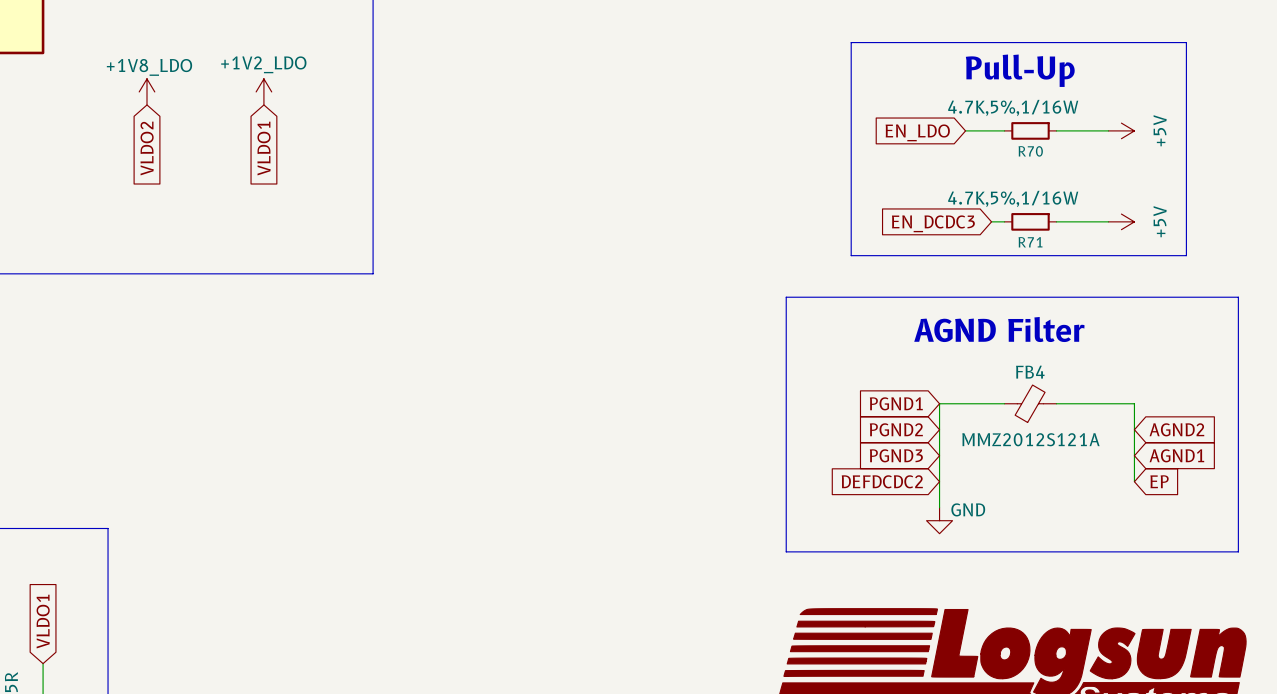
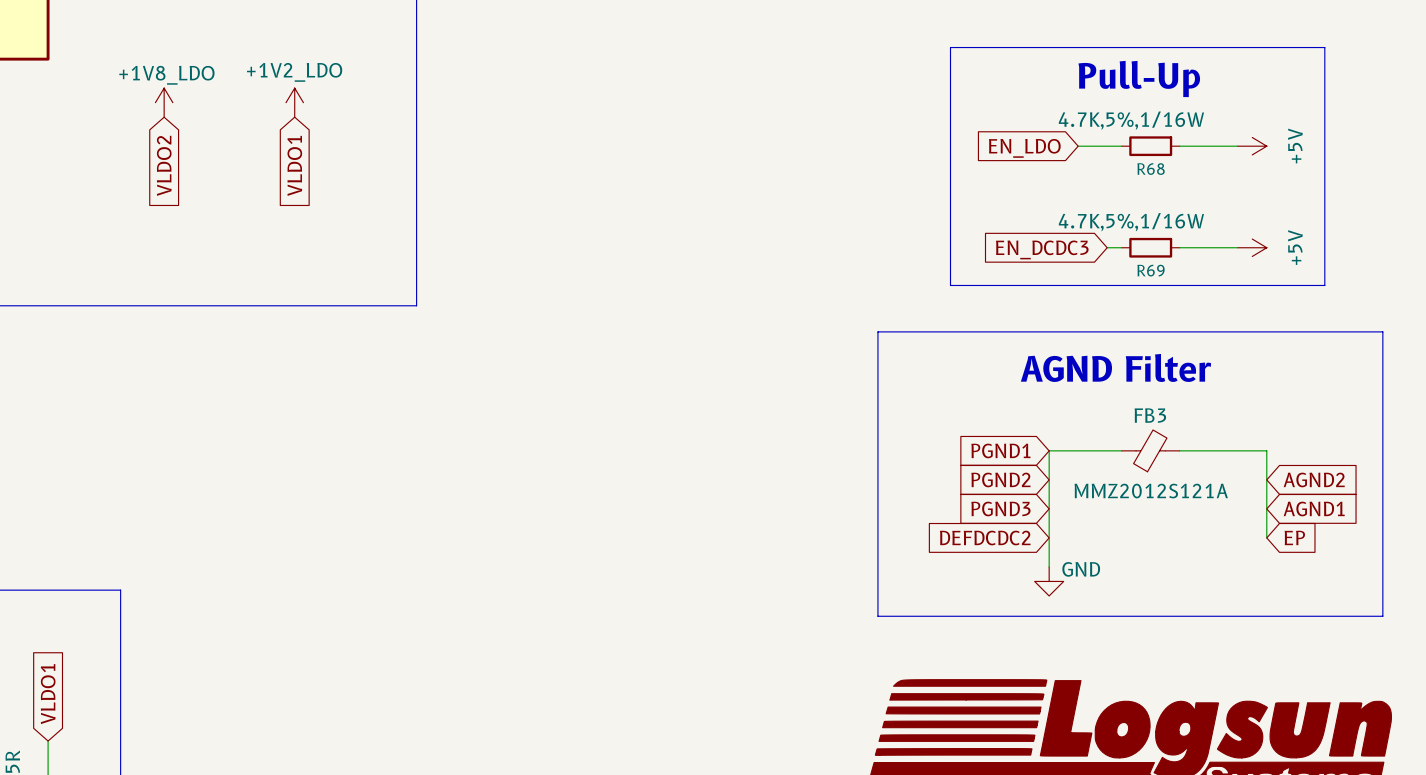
R70 name: R70 (1030, 151) -> R68 (1151, 169)
R71 name: R71 (1030, 242) -> R69 (1151, 270)
FB4 name: FB4 (1030, 372) -> FB3 (1150, 415)

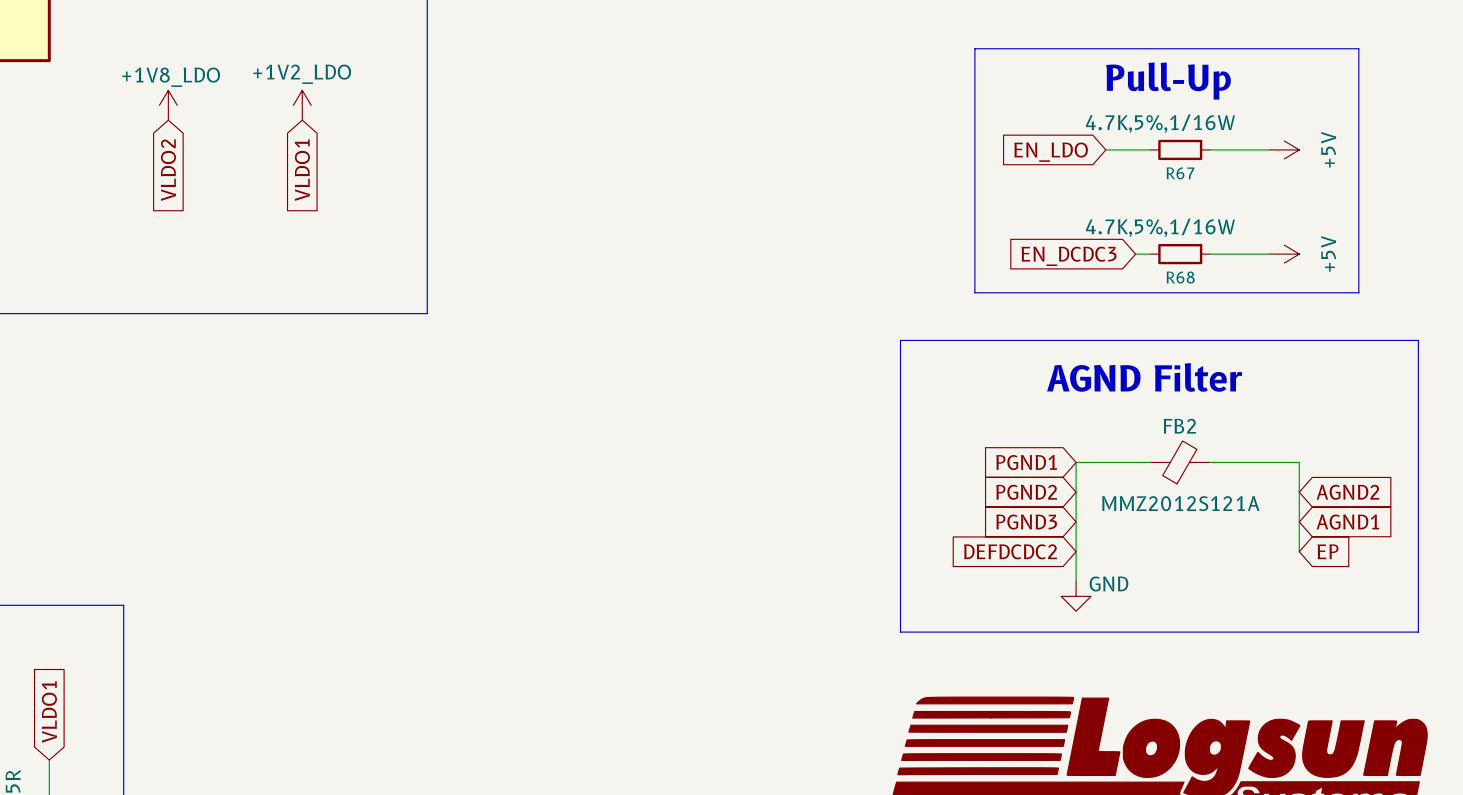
R68 name: R68 (1151, 169) -> R67 (1180, 173)
R69 name: R69 (1151, 270) -> R68 (1180, 277)
FB3 name: FB3 (1150, 415) -> FB2 (1179, 426)

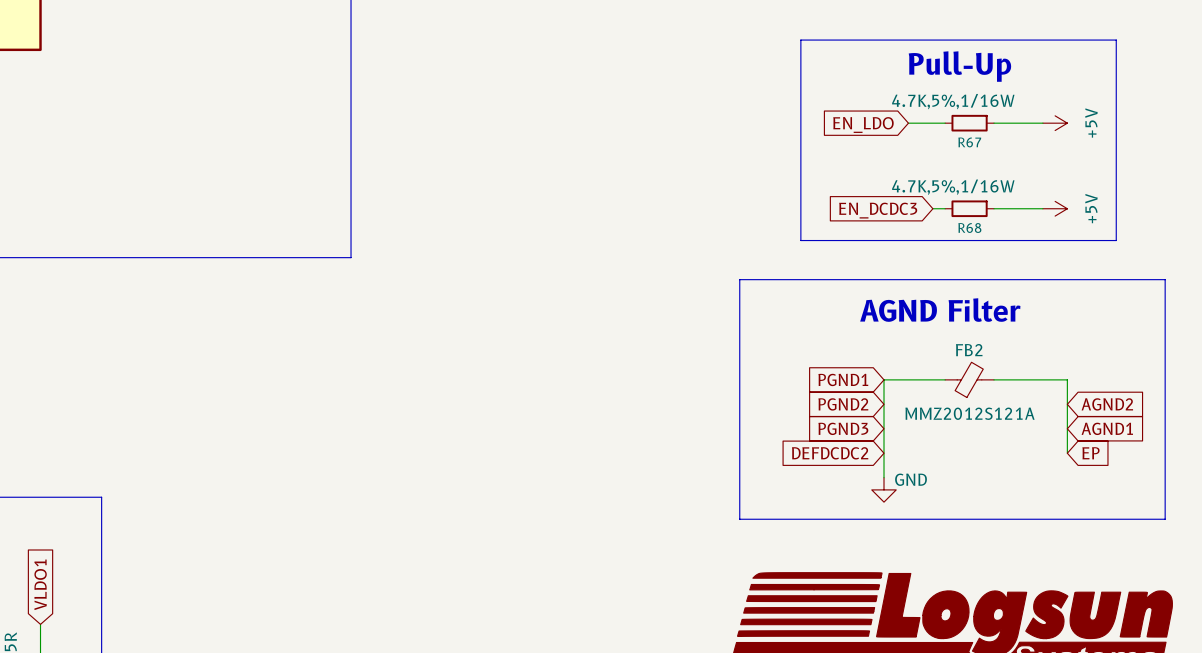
power symbol: +1V8_LDO (168, 105) -> none
power symbol: +1V2_LDO (302, 105) -> none
global label: VLDO2 (168, 170) -> none
global label: VLDO1 (302, 170) -> none

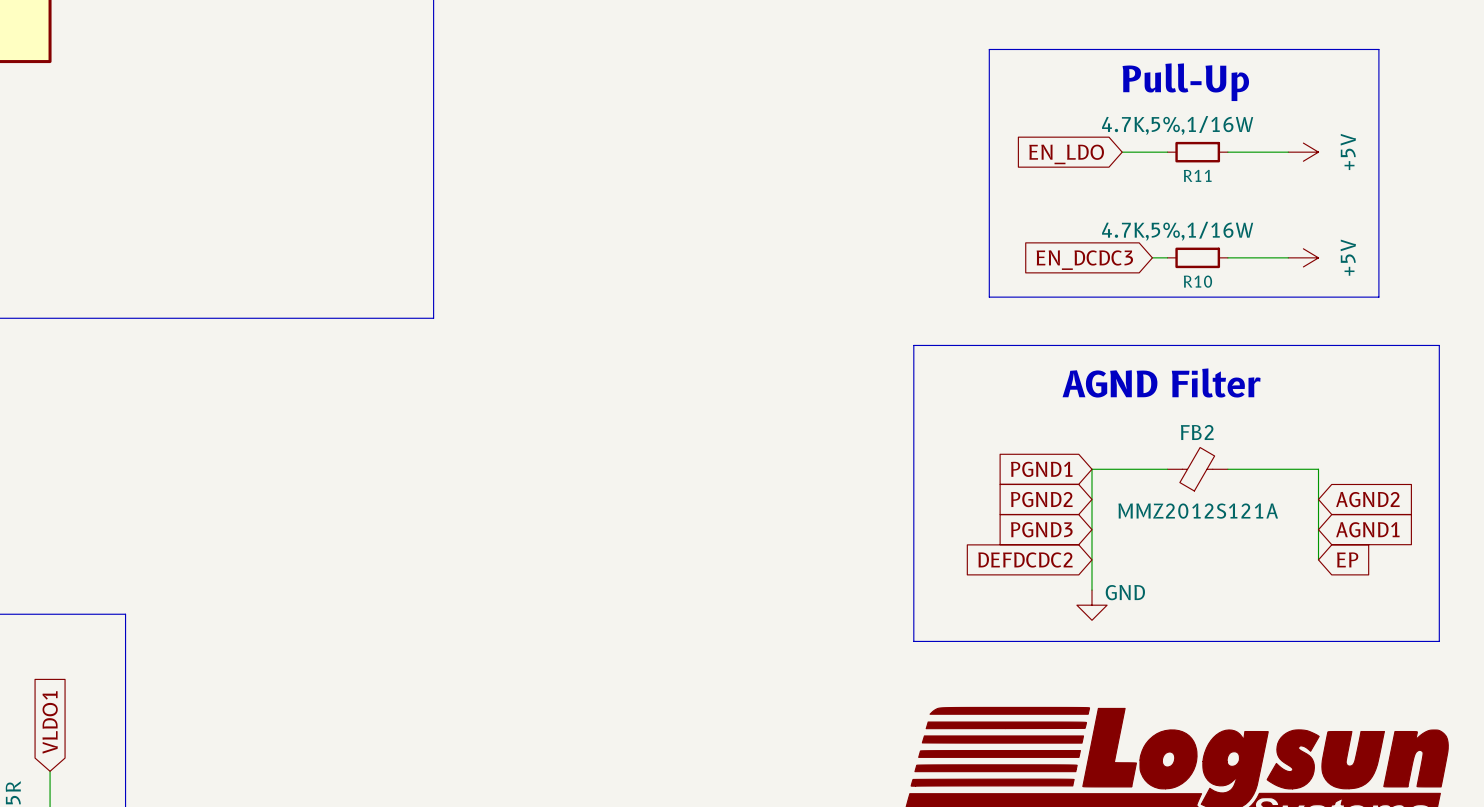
R67 name: R67 (969, 142) -> R11 (1197, 175)
R68 name: R68 (969, 228) -> R10 (1197, 281)

